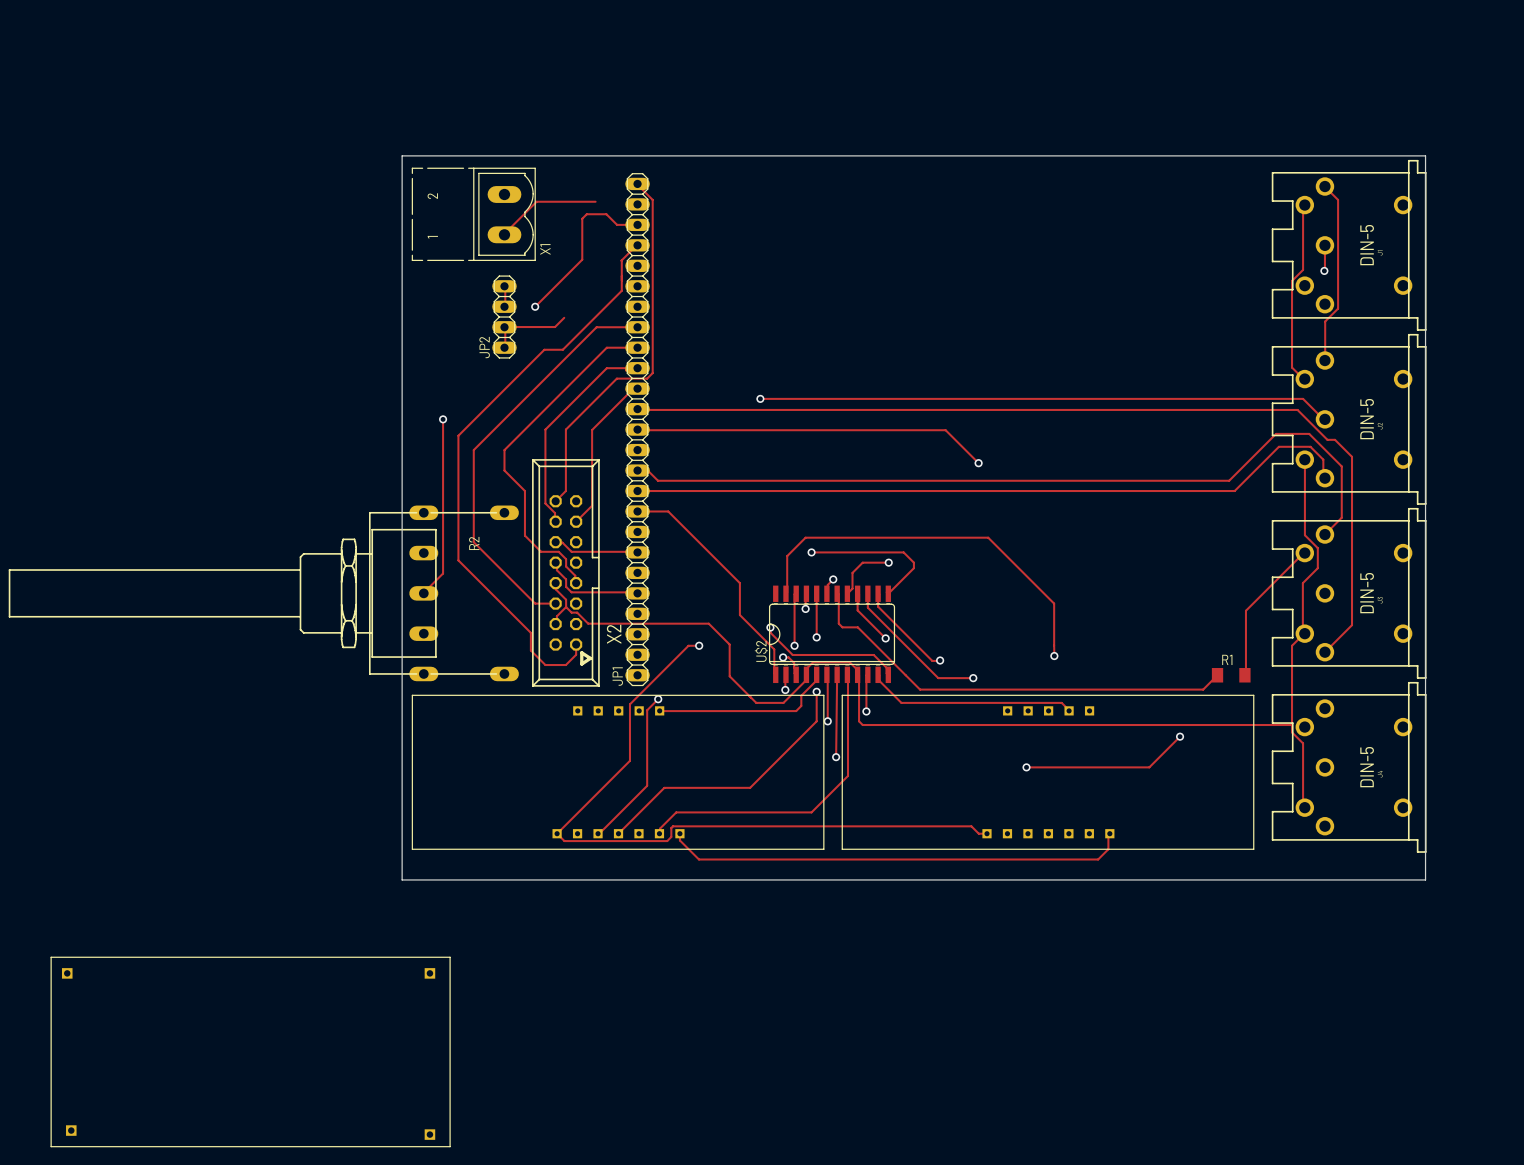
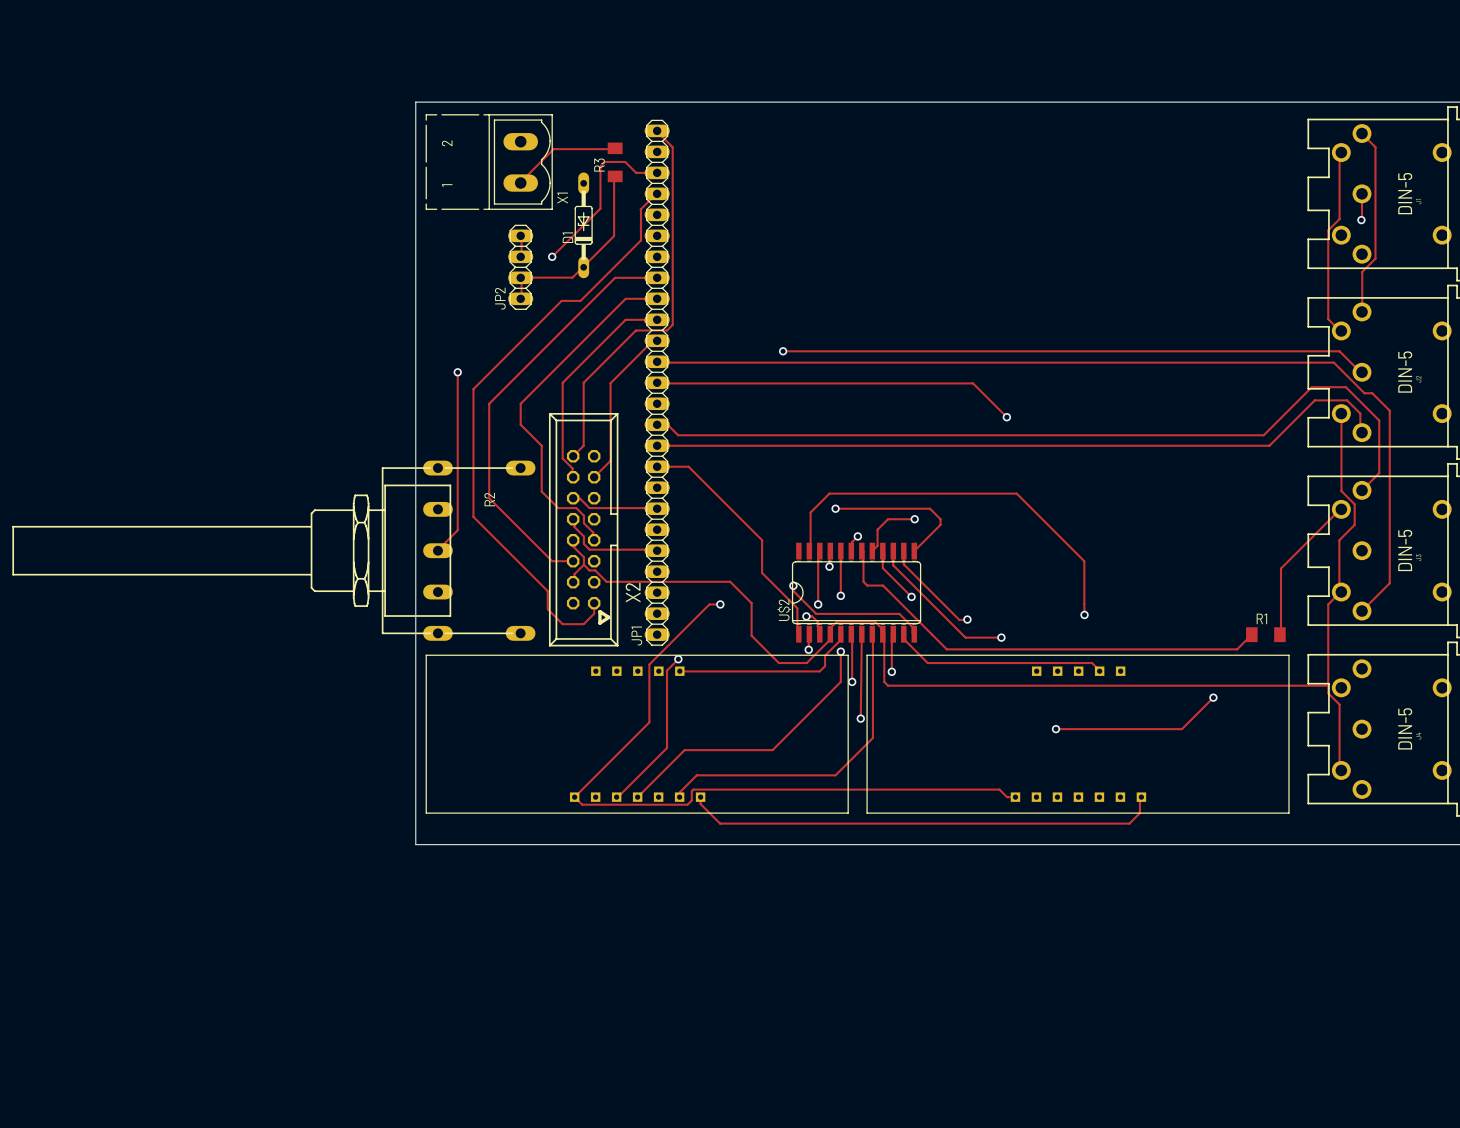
R3: none -> (615, 162)
track: none -> (615, 176) (614, 236) (582, 268)
D1: none -> (583, 225)
part: (250, 1051) -> none

